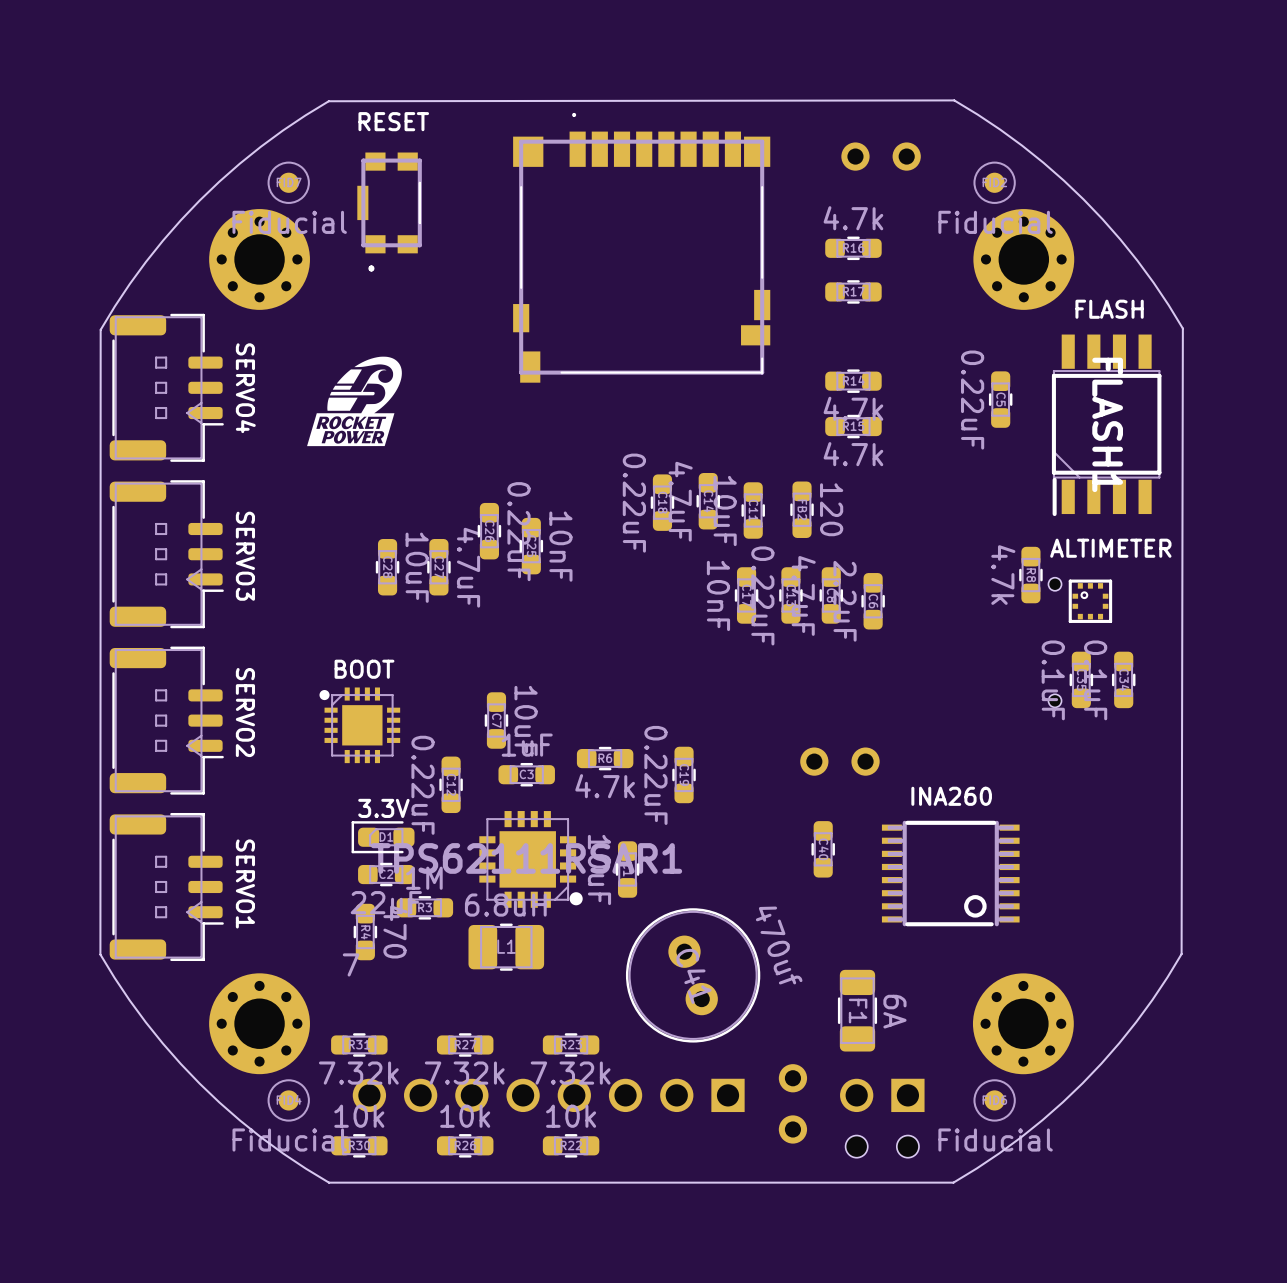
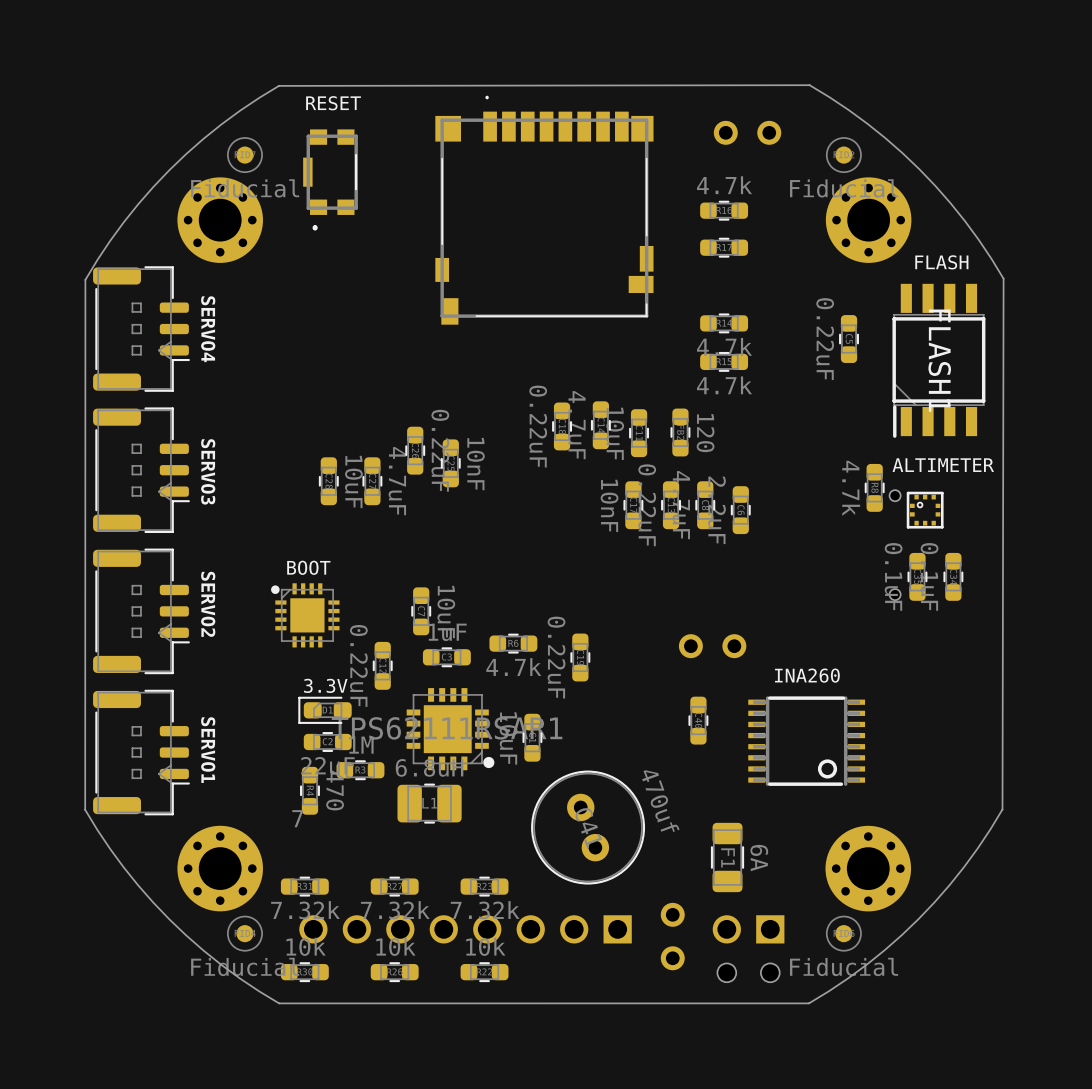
drawing: [307, 356, 402, 447] -> none

